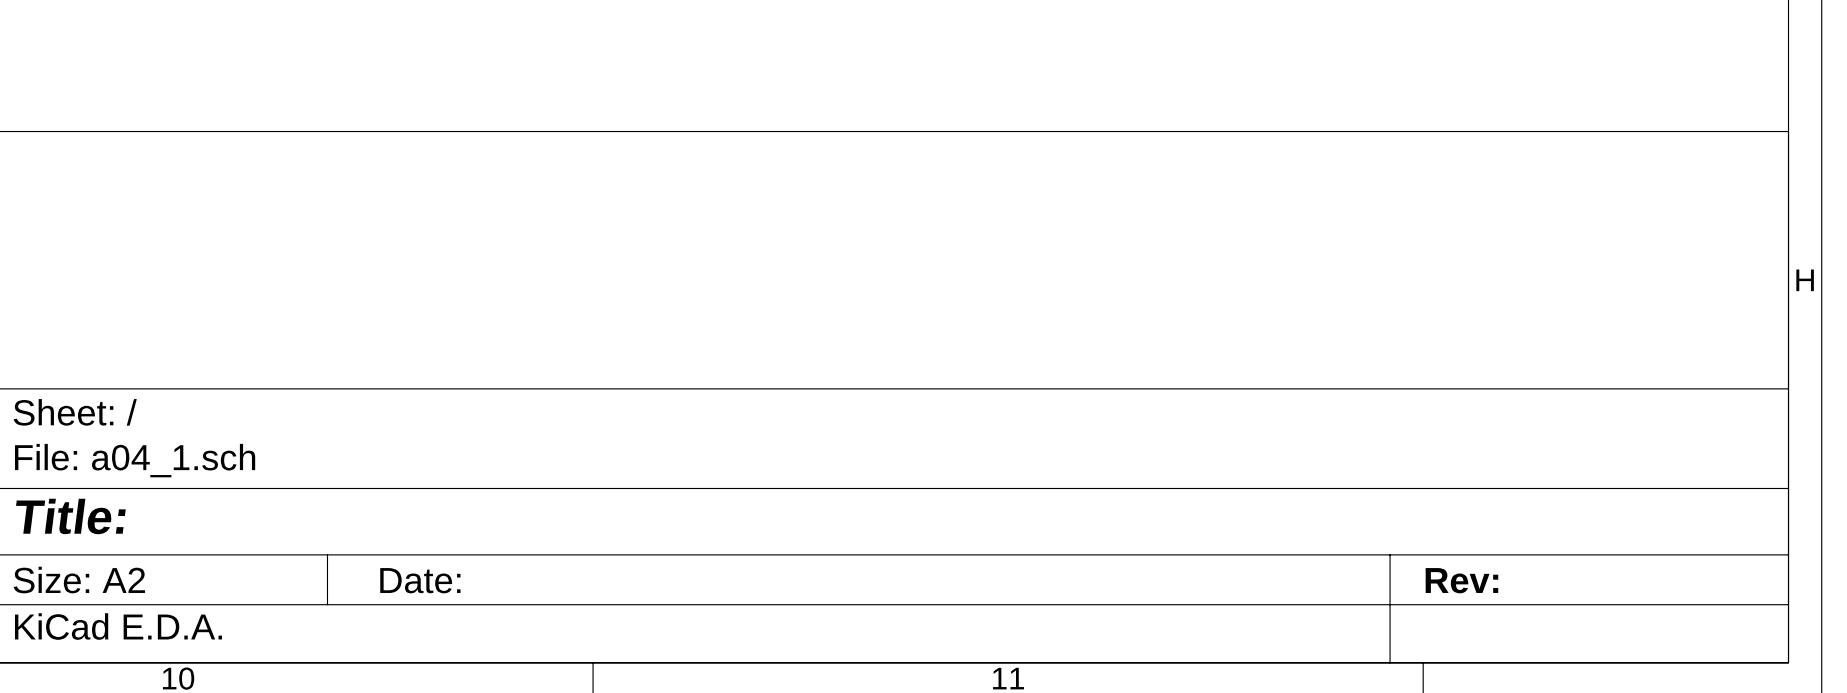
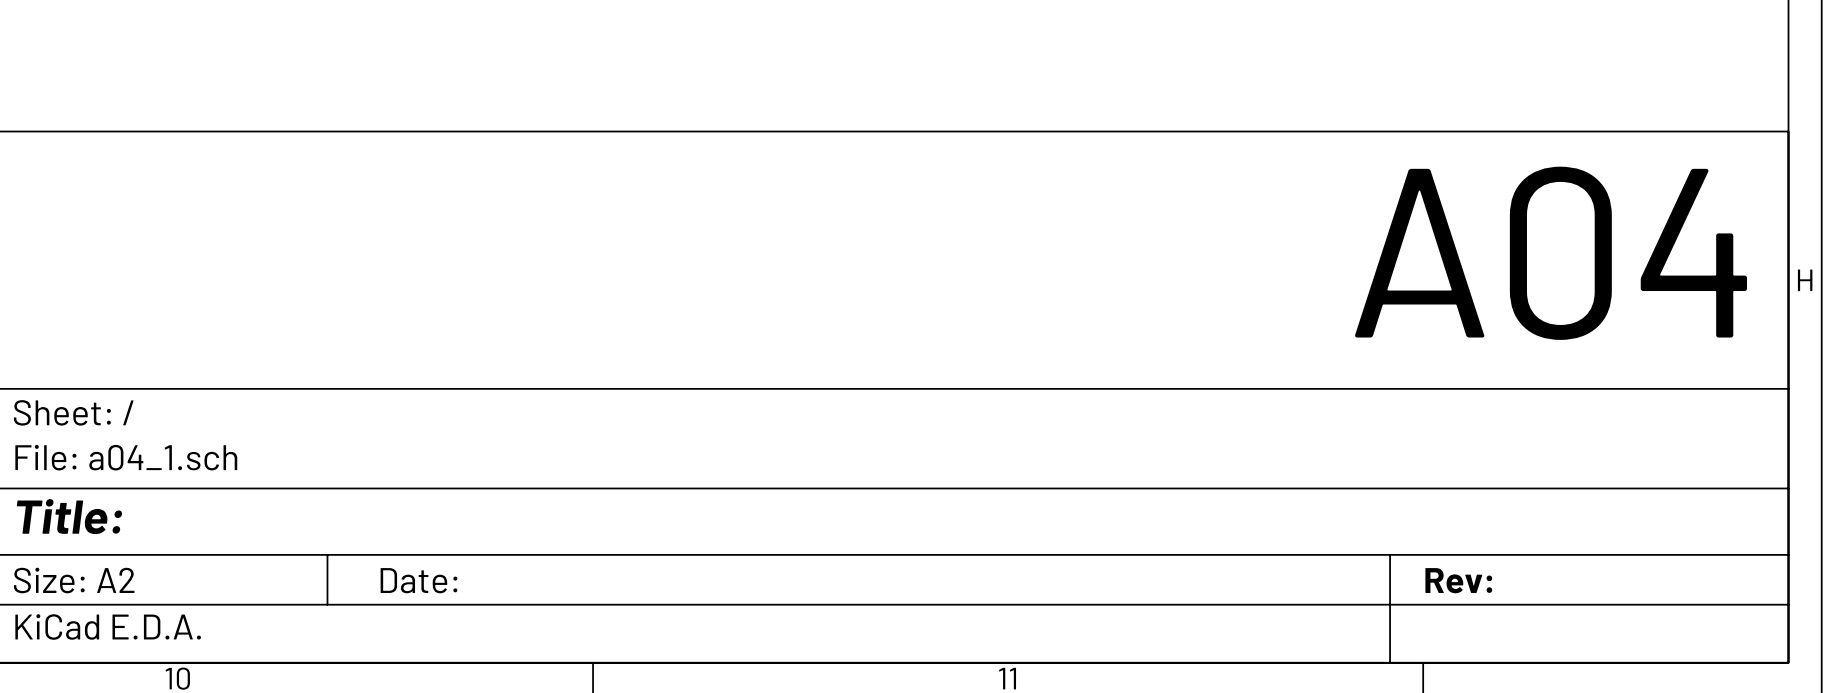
text: none -> A04 (1550, 253)

